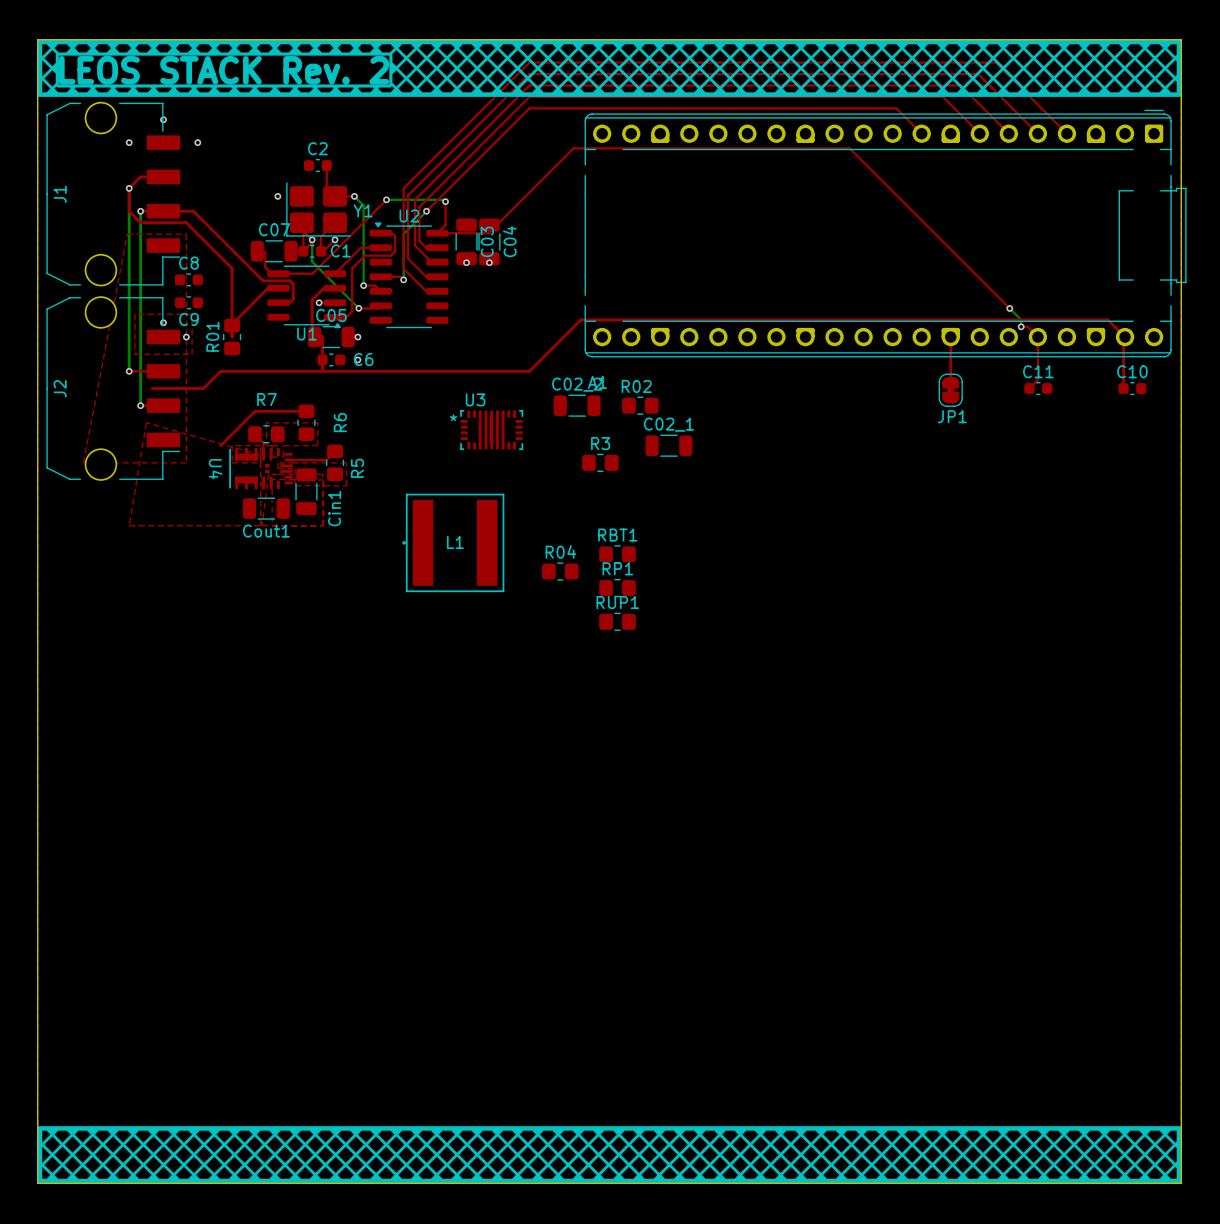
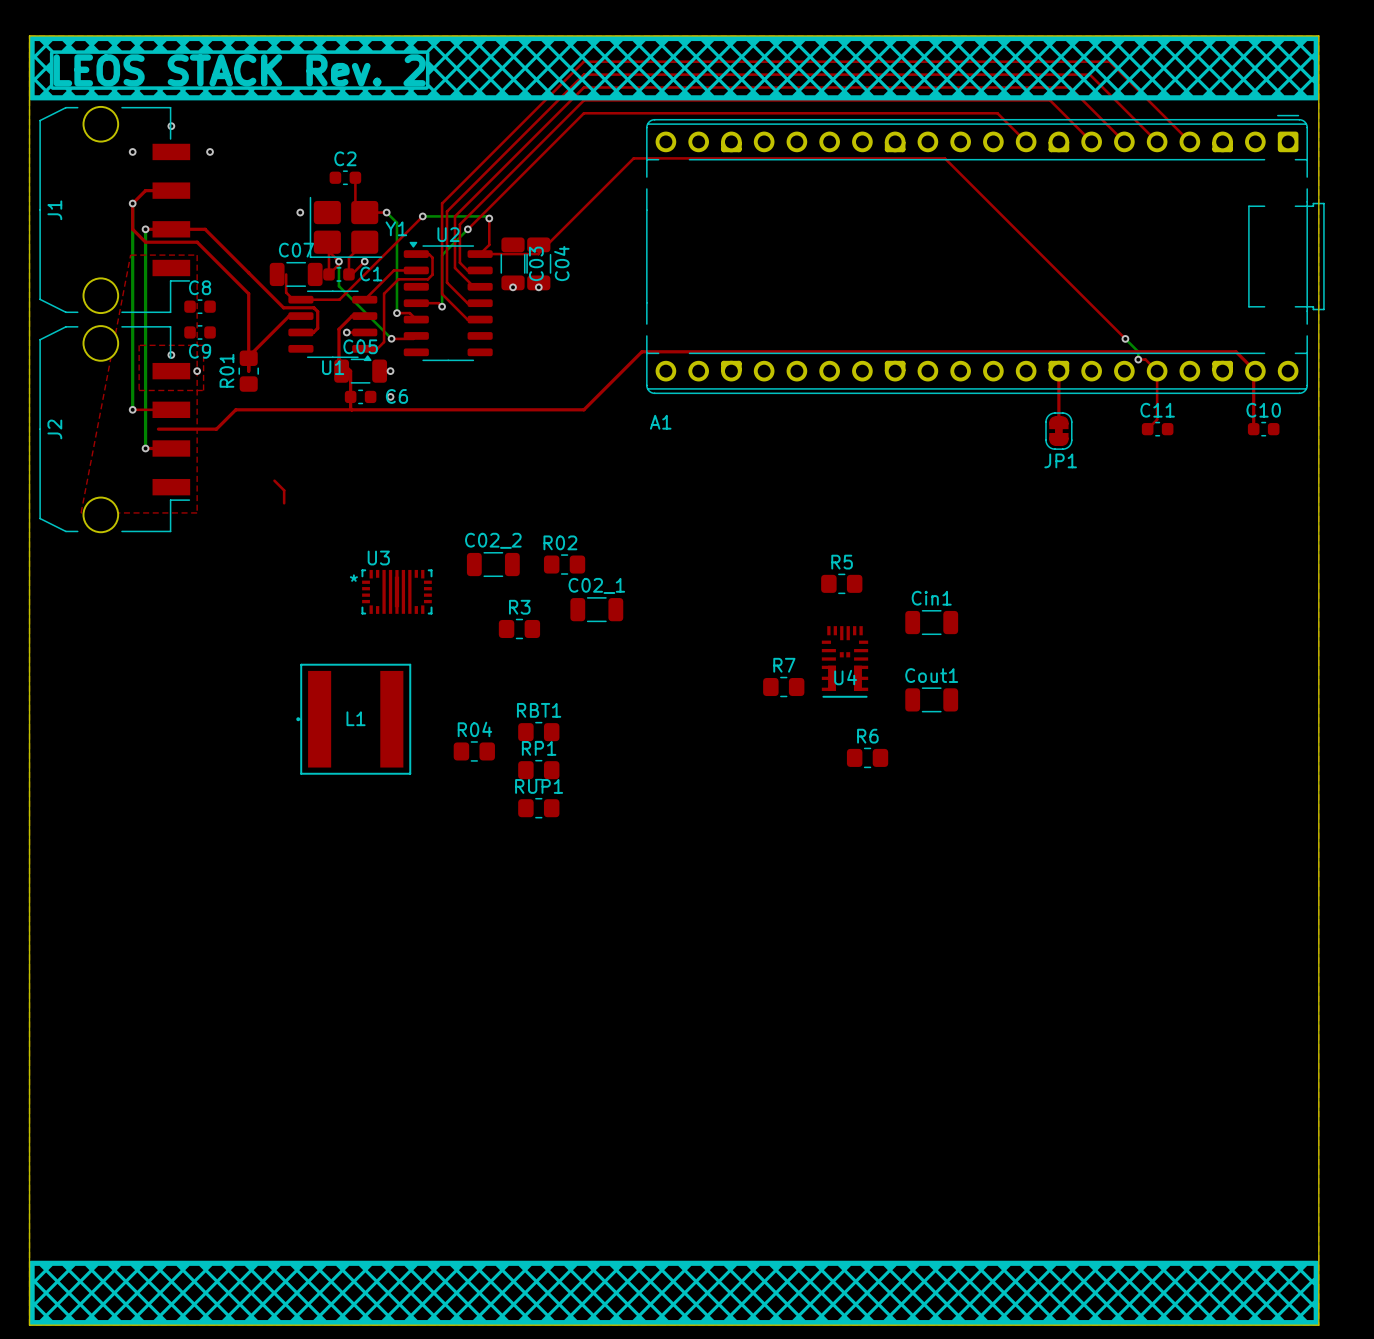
R7 name position: R7 (266, 399) -> R7 (784, 665)
C02_2 position: (577, 405) -> (493, 564)
R02 position: (640, 405) -> (564, 564)
top track: (306, 411) (254, 411) (220, 445) -> none
R6 rotation: 0° (306, 422) -> 90° clockwise (867, 757)
R6 position: (306, 422) -> (867, 757)
R6 name position: R6 (340, 422) -> R6 (867, 736)
U3 position: (491, 429) -> (396, 591)
R7 position: (266, 434) -> (783, 687)
top zone outline: (272, 445) (272, 457) (283, 457) (283, 445) (317, 445) (317, 422) (266, 422) (266, 445) (277, 445) -> none
C02_1 position: (668, 445) -> (596, 609)
top track: (335, 451) (326, 460) (288, 460) -> none
top zone outline: (260, 455) (146, 422) (129, 525) (260, 525) (260, 445) (232, 445) (232, 462) (260, 462) -> none
top zone outline: (277, 462) (277, 468) (295, 468) (295, 485) (346, 485) (346, 462) (277, 462) -> none
R5 rotation: 0° (335, 462) -> 90° clockwise (841, 583)
R5 position: (335, 462) -> (841, 583)
R3 position: (600, 462) -> (519, 628)
U4 rotation: 0° (260, 468) -> 90° counterclockwise (844, 661)
U4 position: (260, 468) -> (844, 661)
R5 name position: R5 (357, 468) -> R5 (842, 562)
U4 name position: U4 (215, 469) -> U4 (845, 677)
Cin1 rotation: 0° (306, 491) -> 90° clockwise (931, 622)
Cin1 position: (306, 491) -> (931, 622)
Cout1 position: (266, 508) -> (931, 699)
Cin1 name position: Cin1 (334, 508) -> Cin1 (931, 598)
top zone outline: (272, 525) (272, 479) (323, 480) (323, 525) (262, 525) (268, 474) (322, 474) (322, 525) -> none
Cout1 name position: Cout1 (266, 531) -> Cout1 (931, 675)
L1 position: (453, 542) -> (353, 719)
RBT1 position: (617, 554) -> (538, 732)
R04 position: (560, 571) -> (474, 751)
RP1 position: (617, 588) -> (538, 770)
RUP1 position: (617, 621) -> (538, 808)

